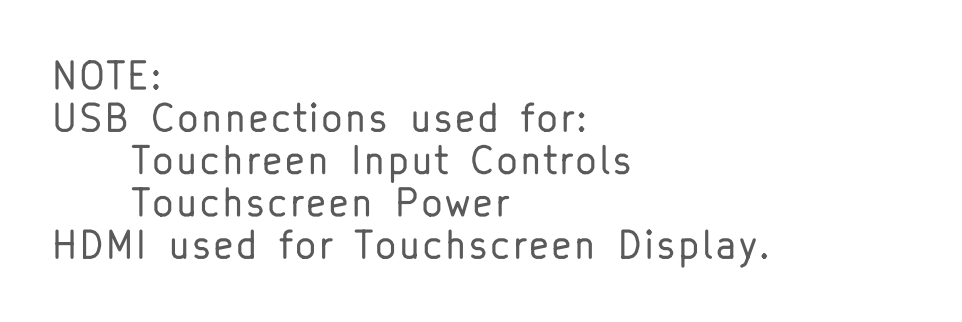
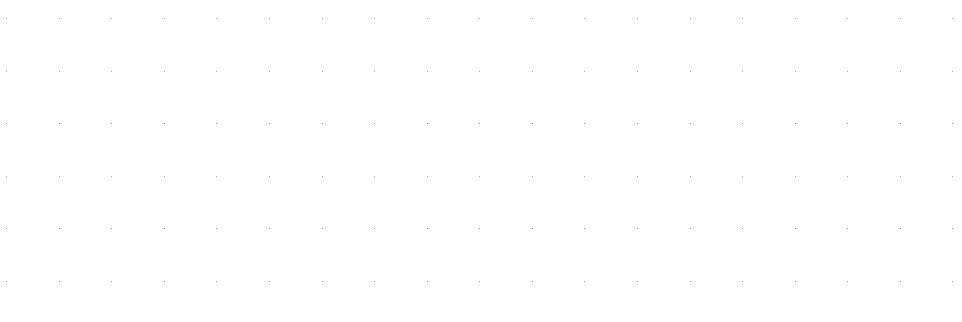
text: NOTE: (107, 74) -> none
text: USB Connections used for: (319, 117) -> none
text: Touchreen Input Controls (380, 163) -> none
text: Touchscreen Power (320, 201) -> none
text: HDMI used for Touchscreen Display. (411, 248) -> none

